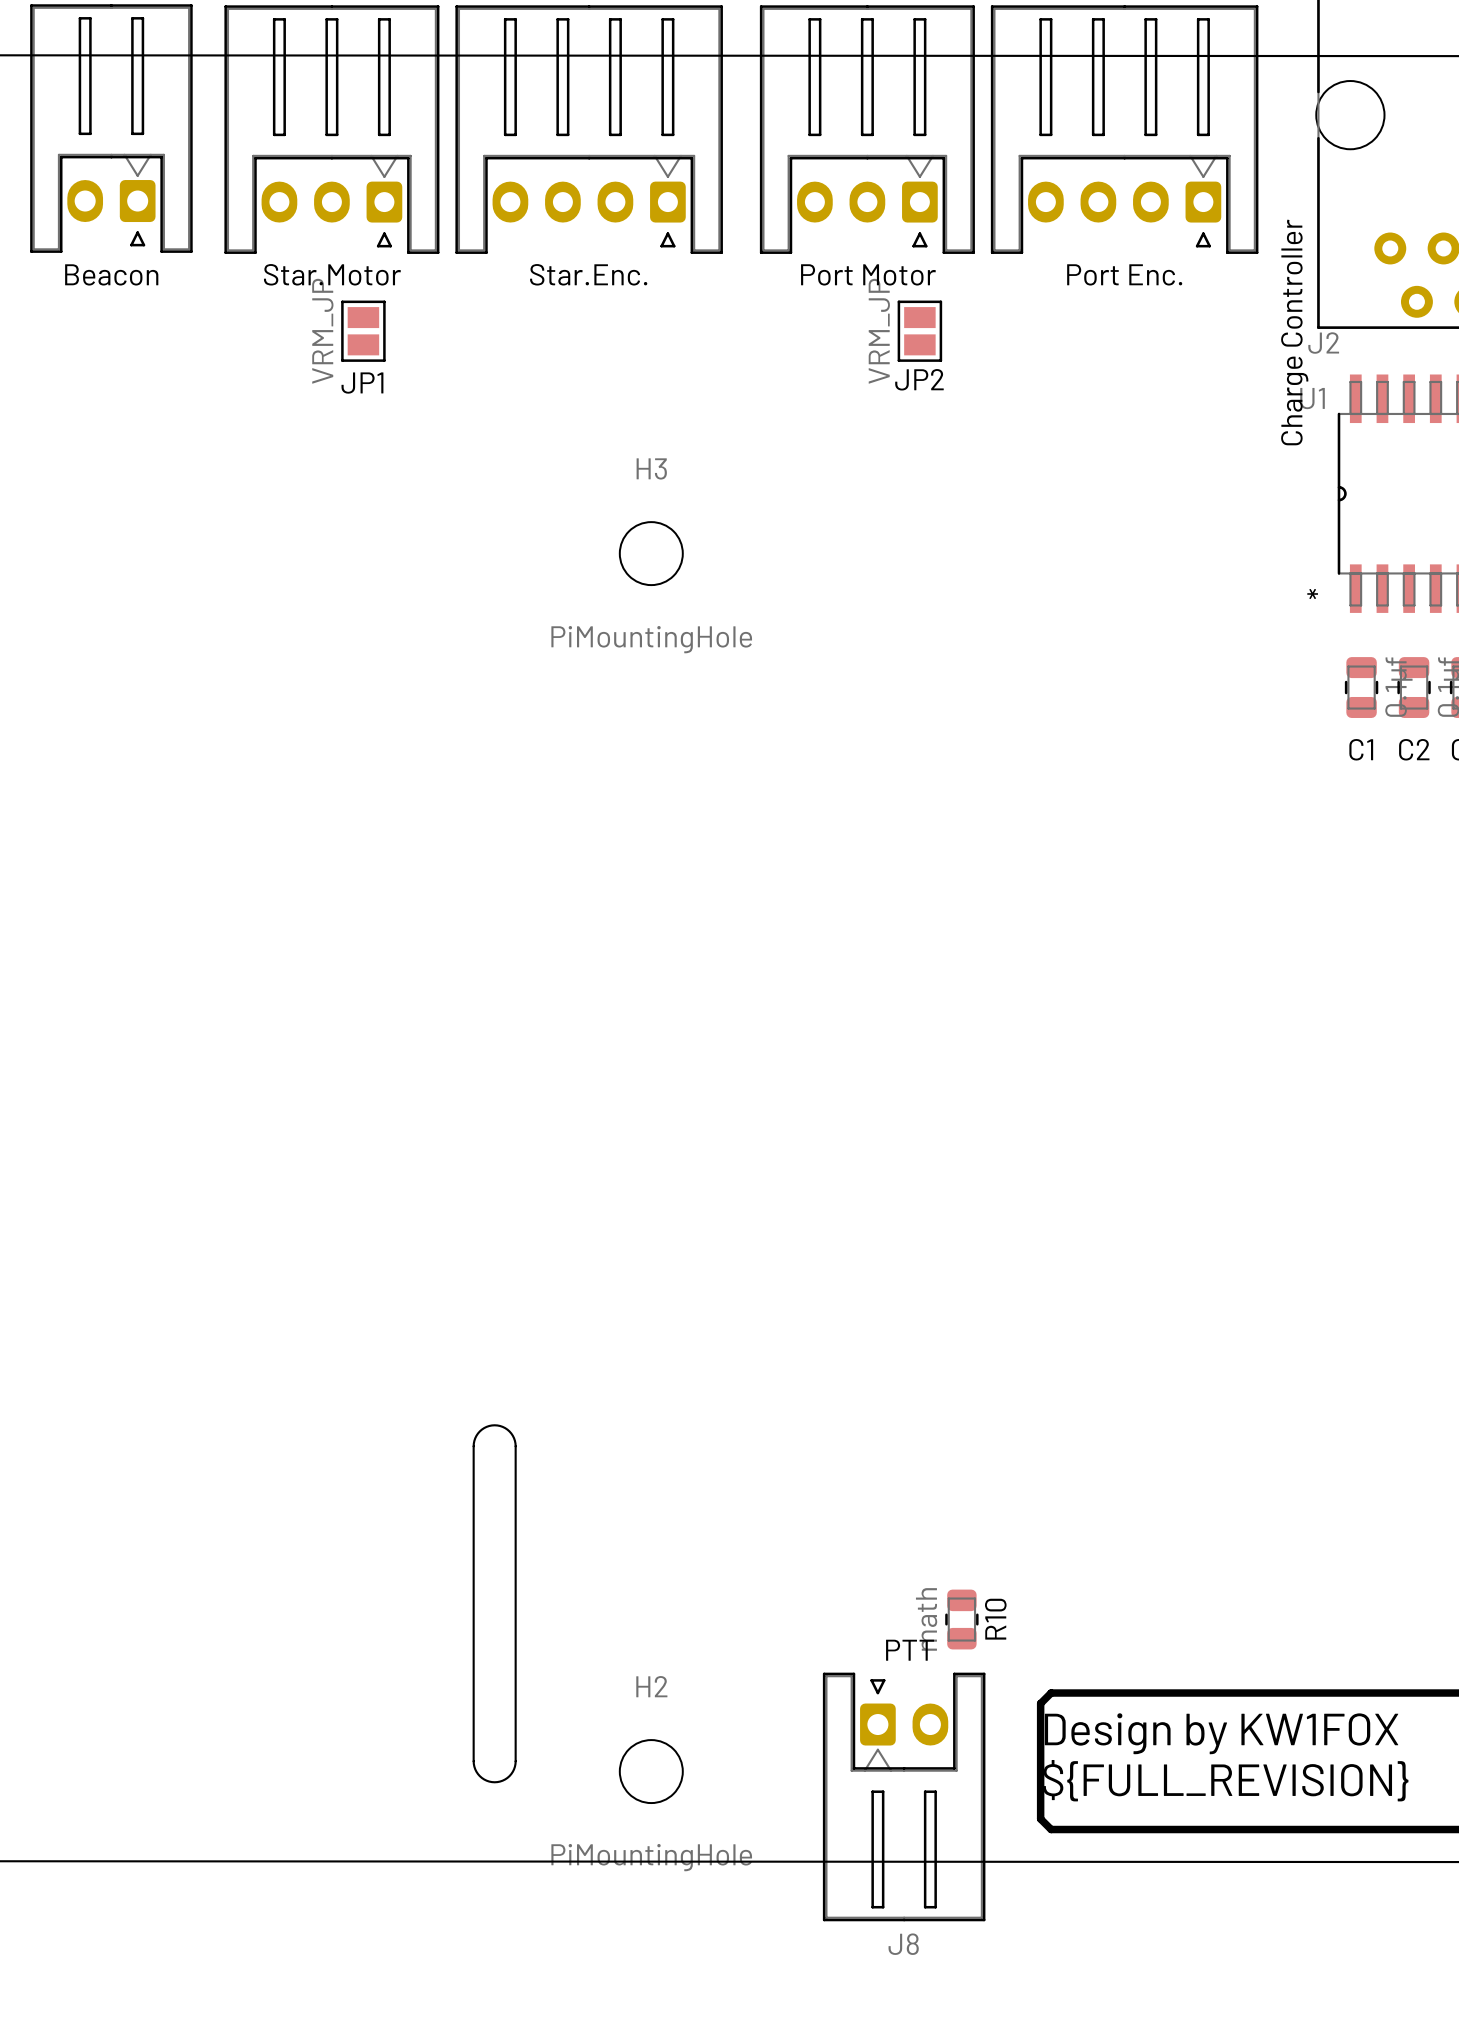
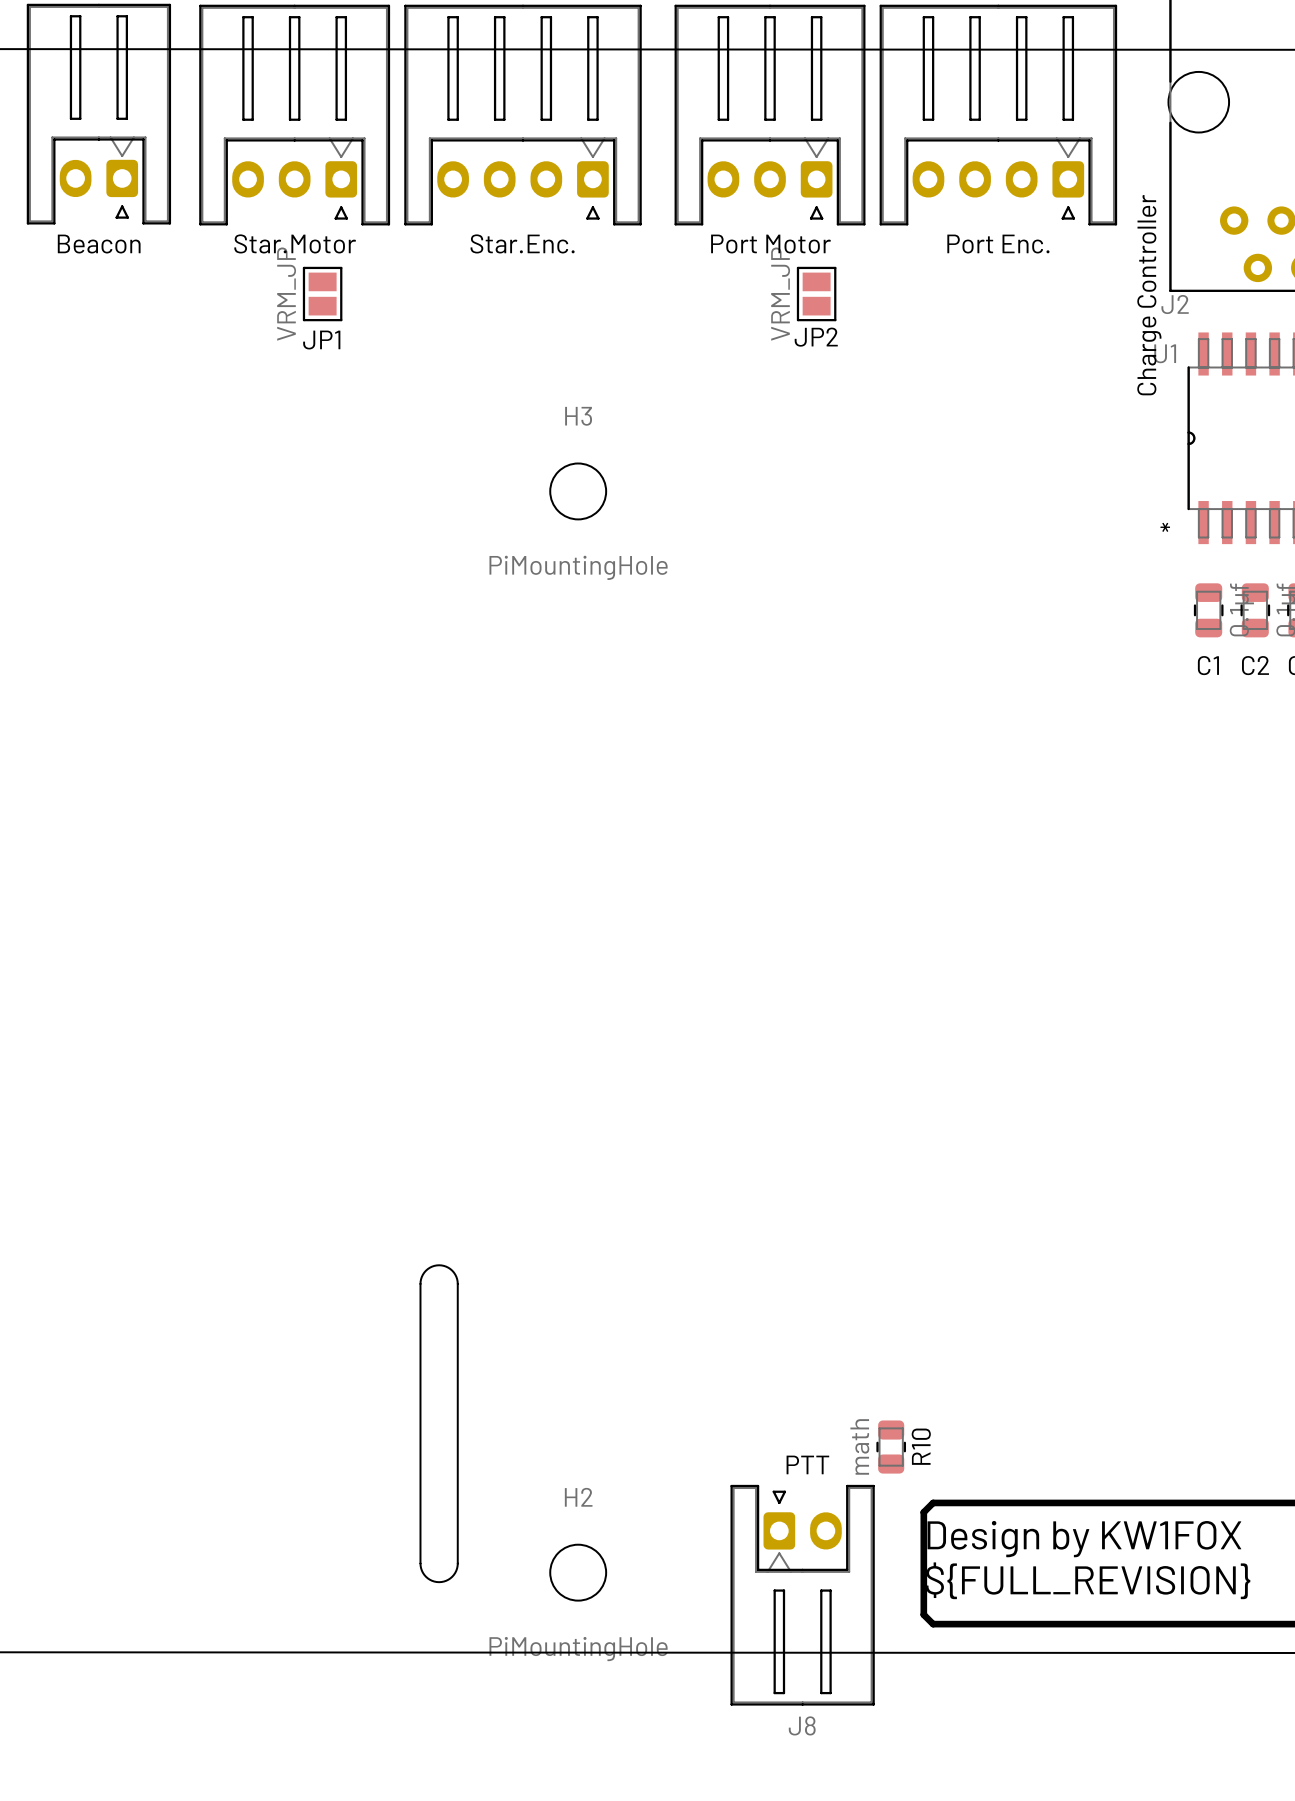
R10 position: (961, 1619) -> (891, 1447)

